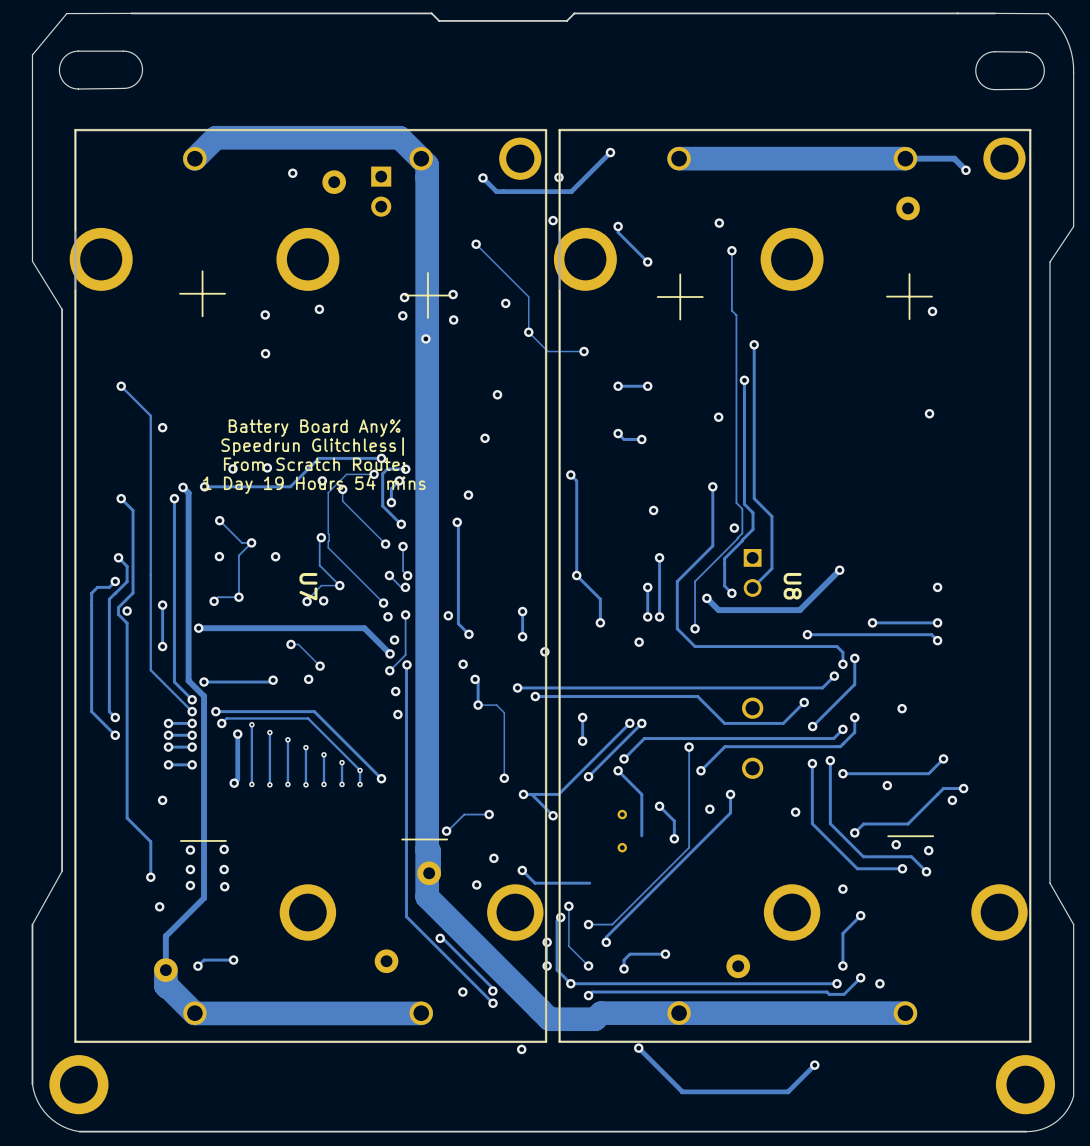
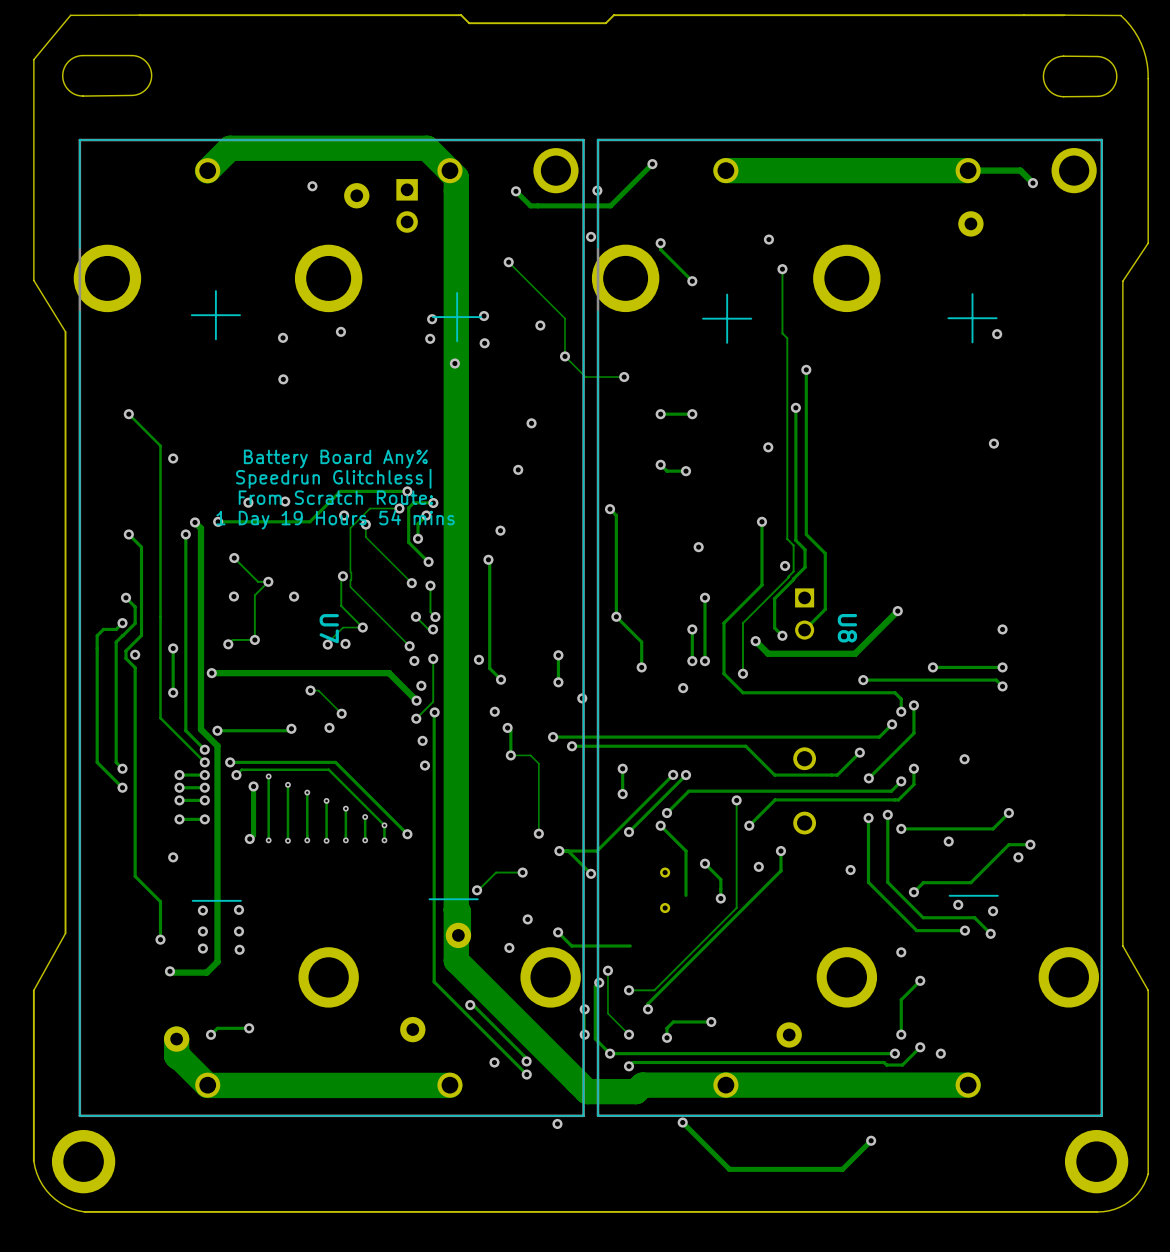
track: (194, 908) (165, 936) (165, 970) -> (206, 972) (168, 972)

